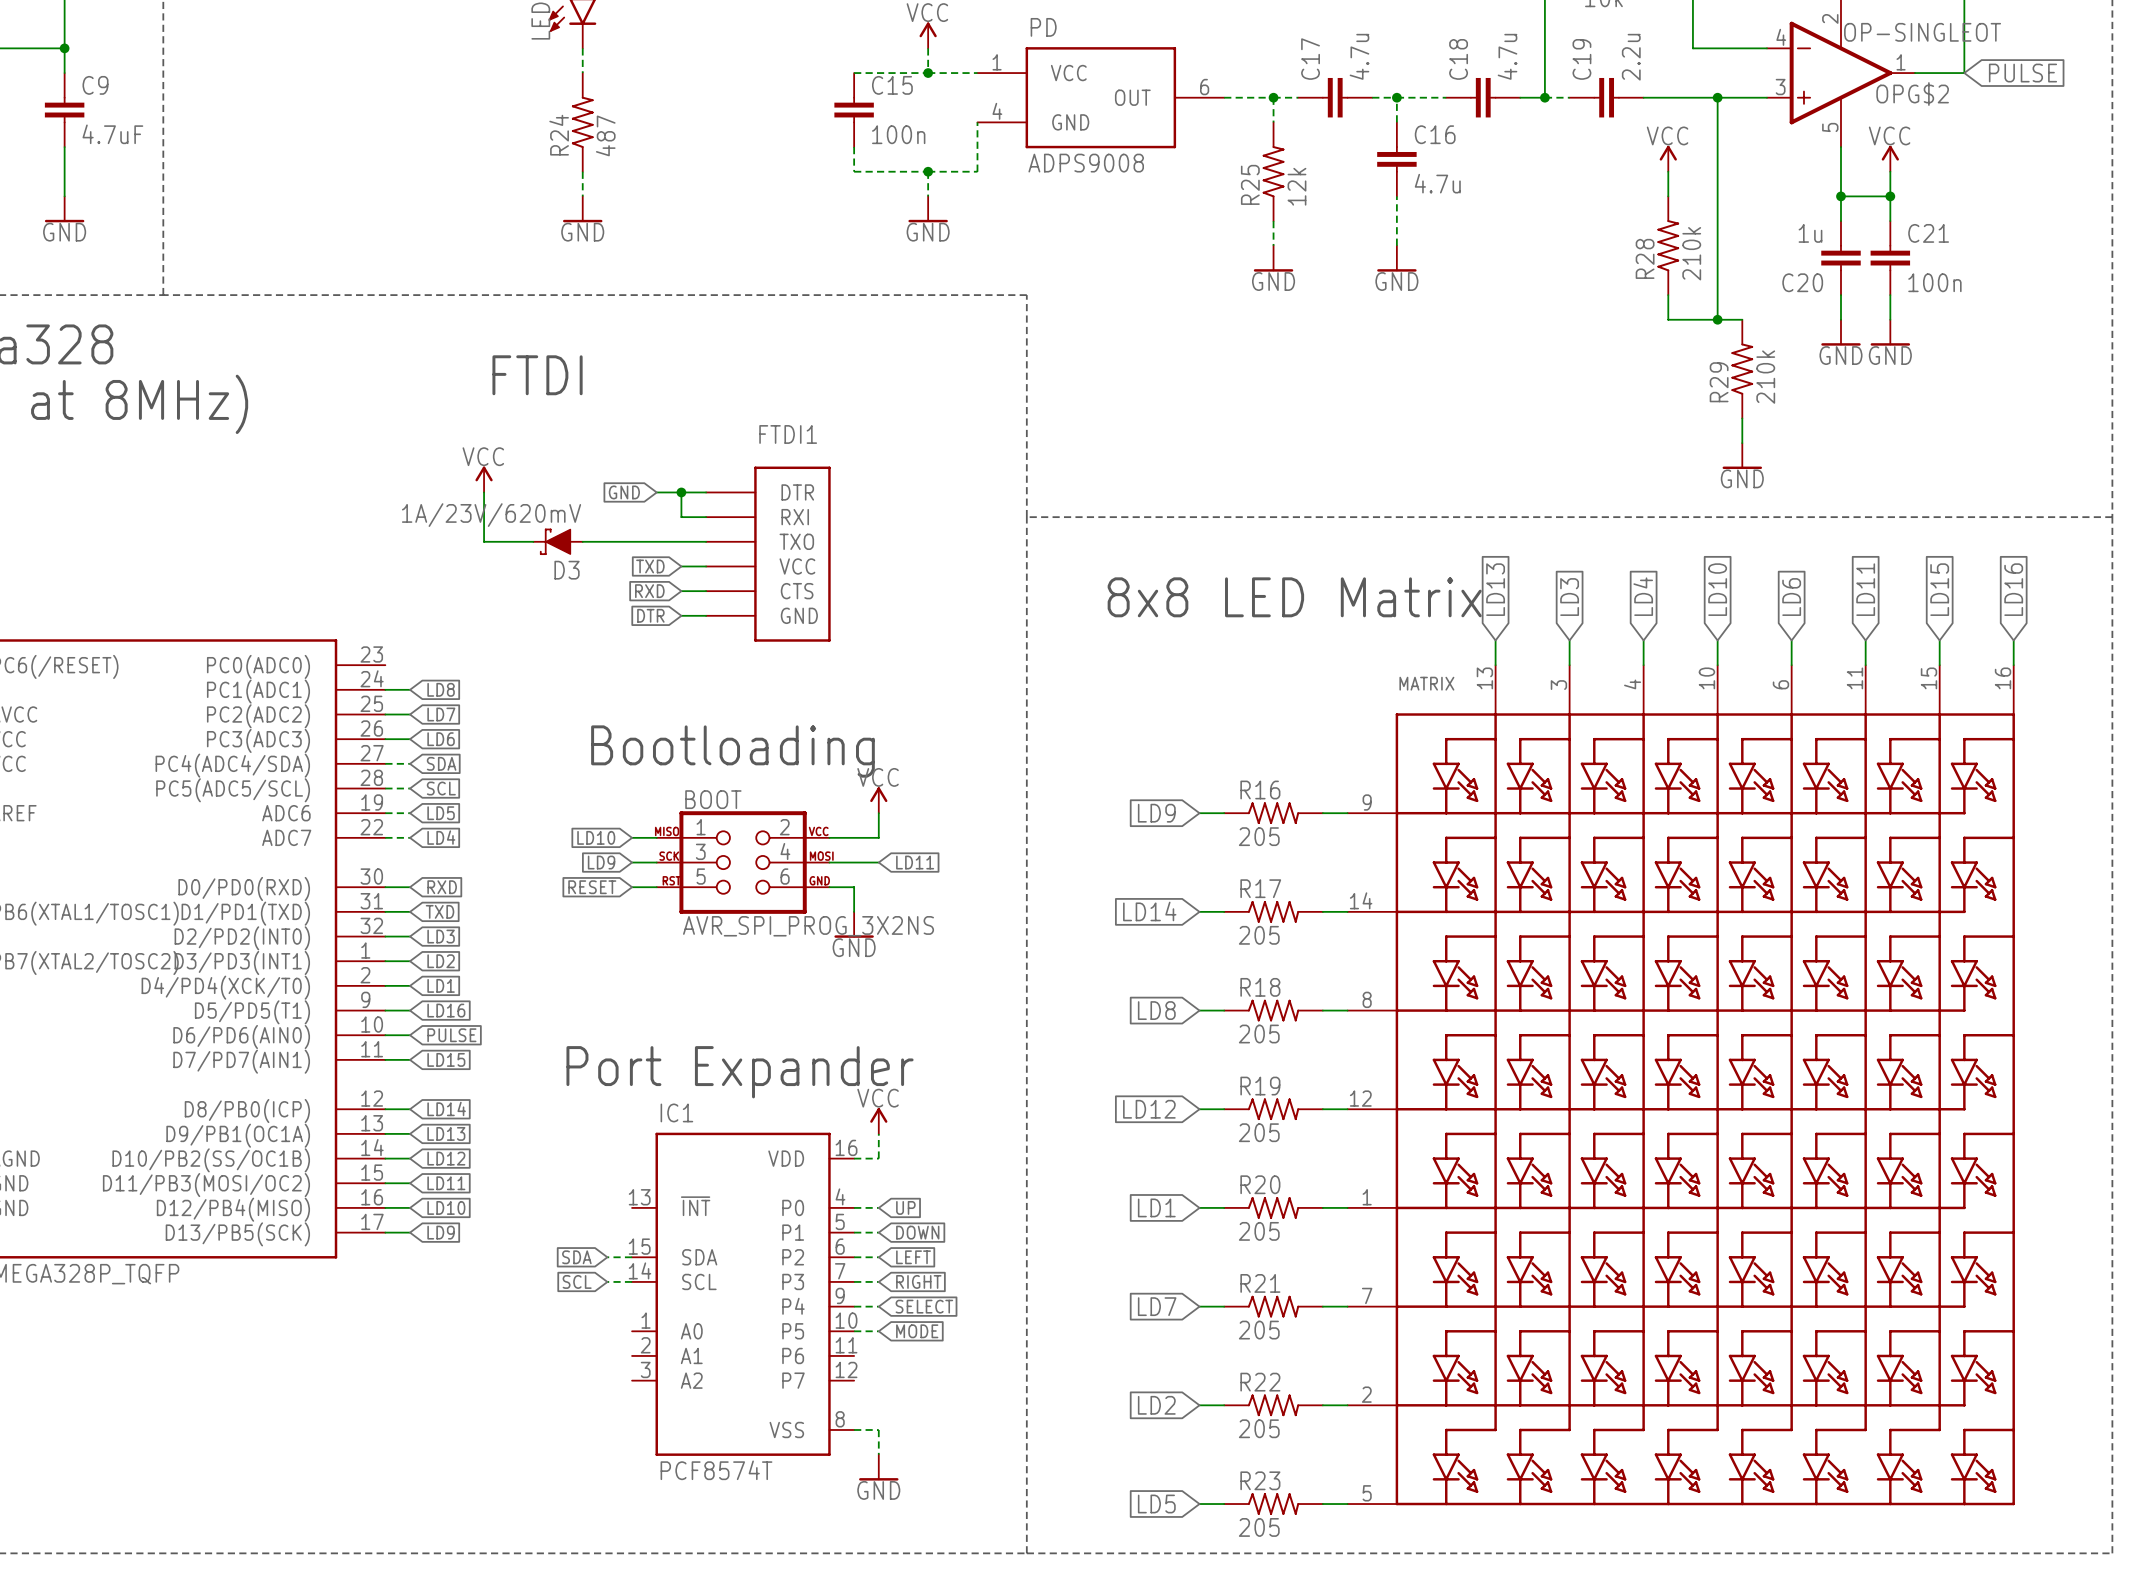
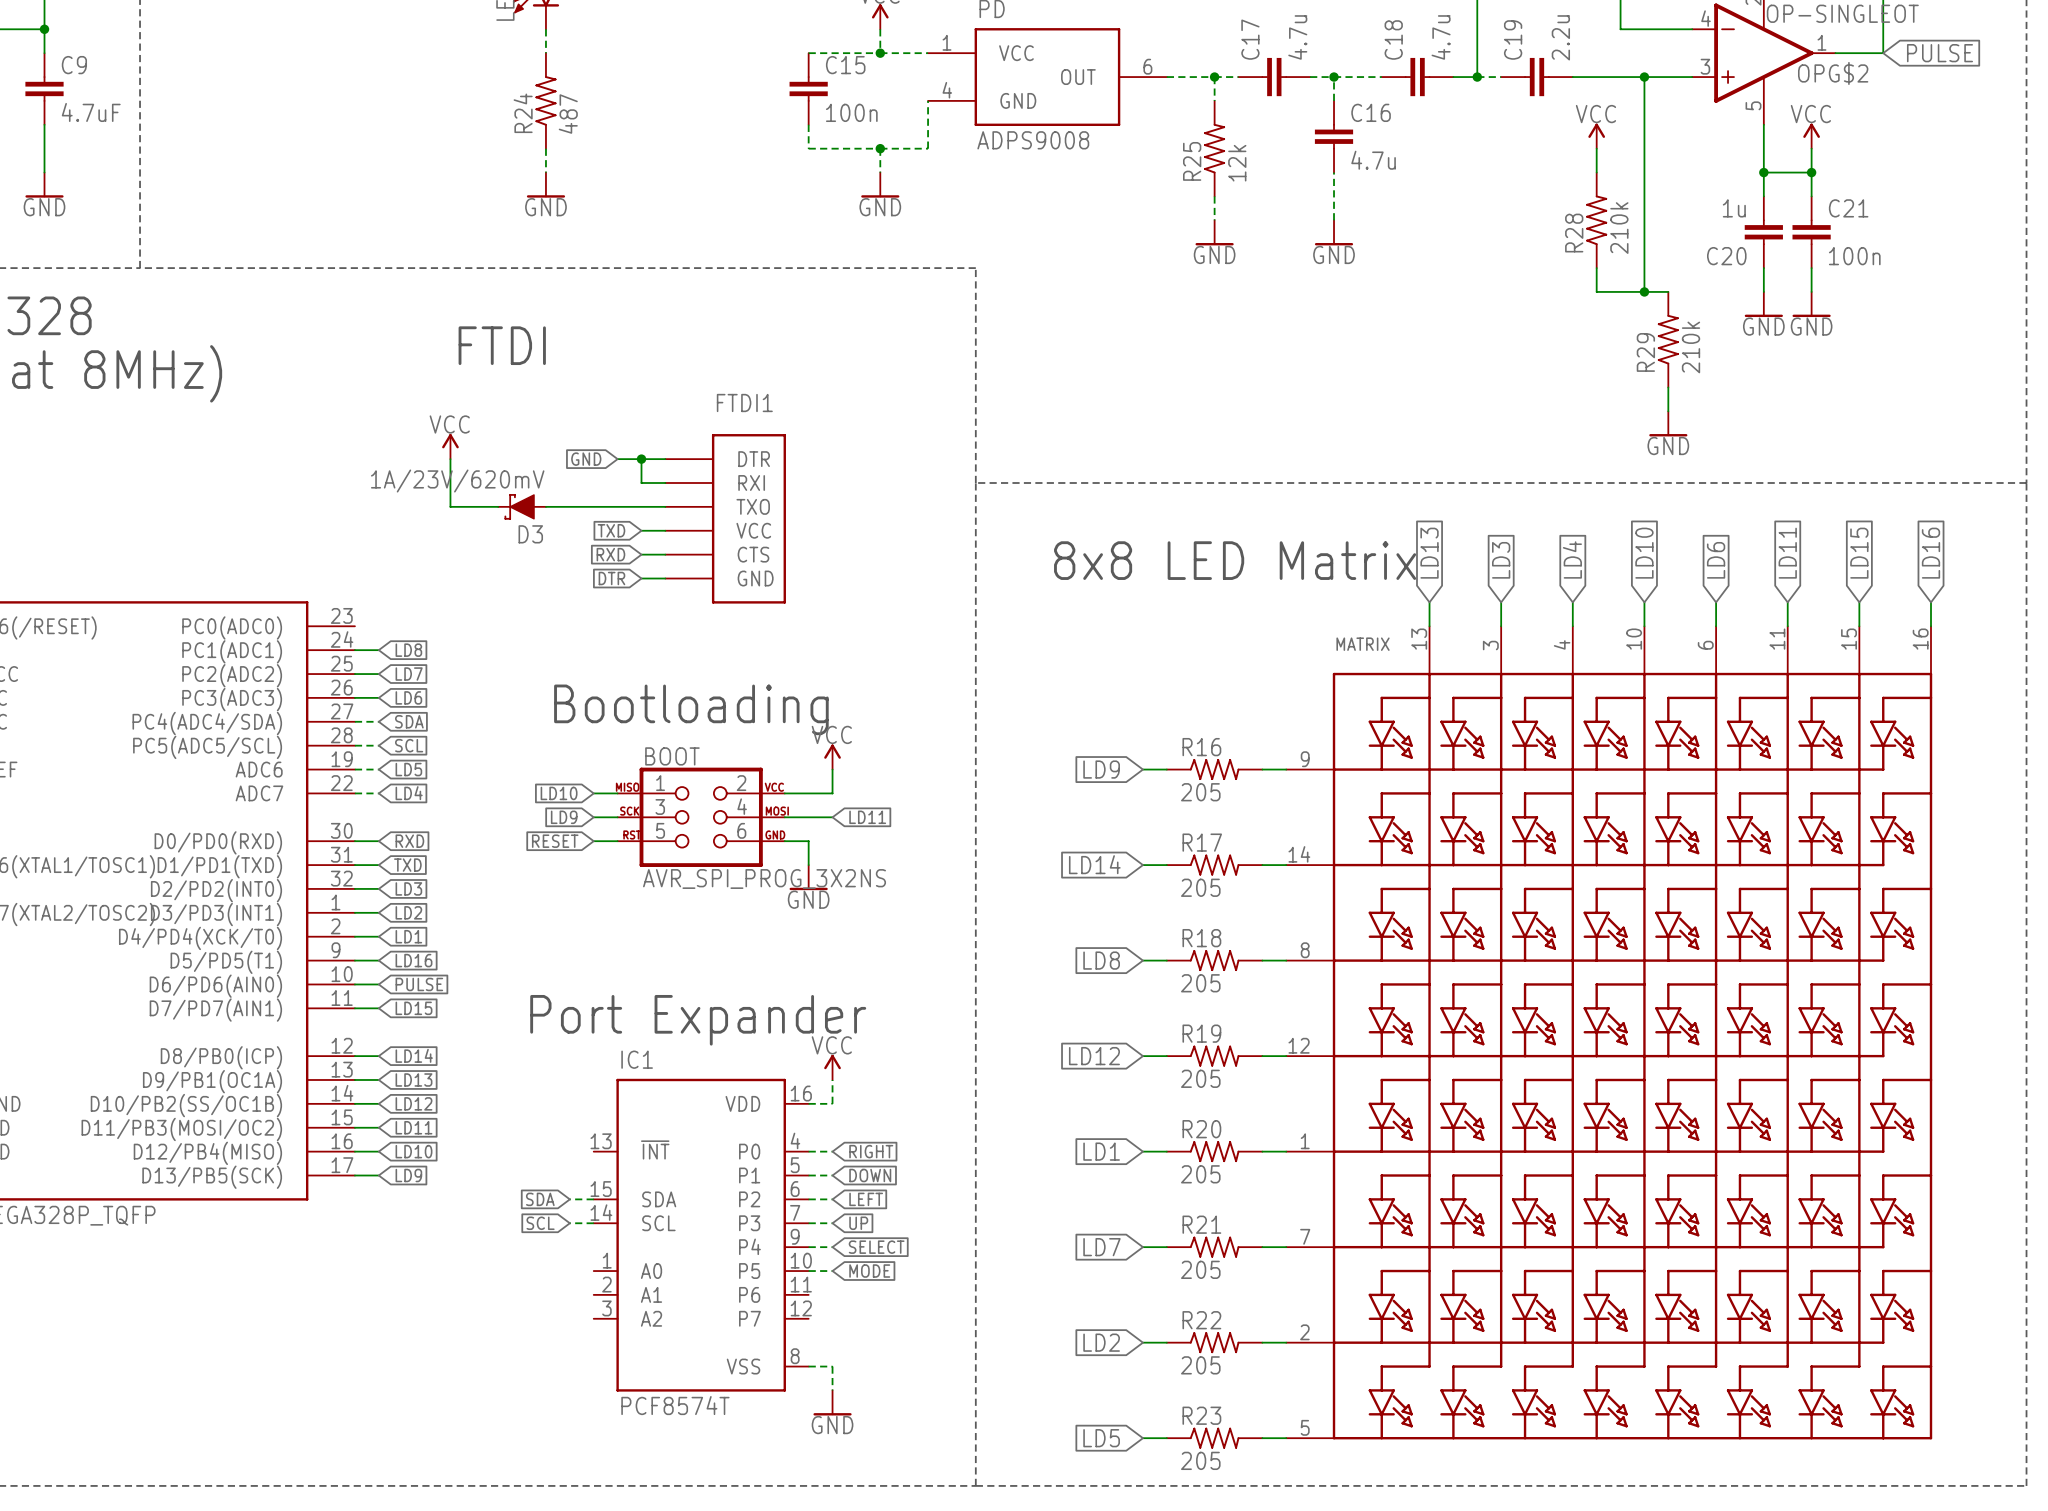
global label: UP (905, 1207) -> RIGHT (871, 1151)
global label: RIGHT (918, 1281) -> UP (858, 1223)

